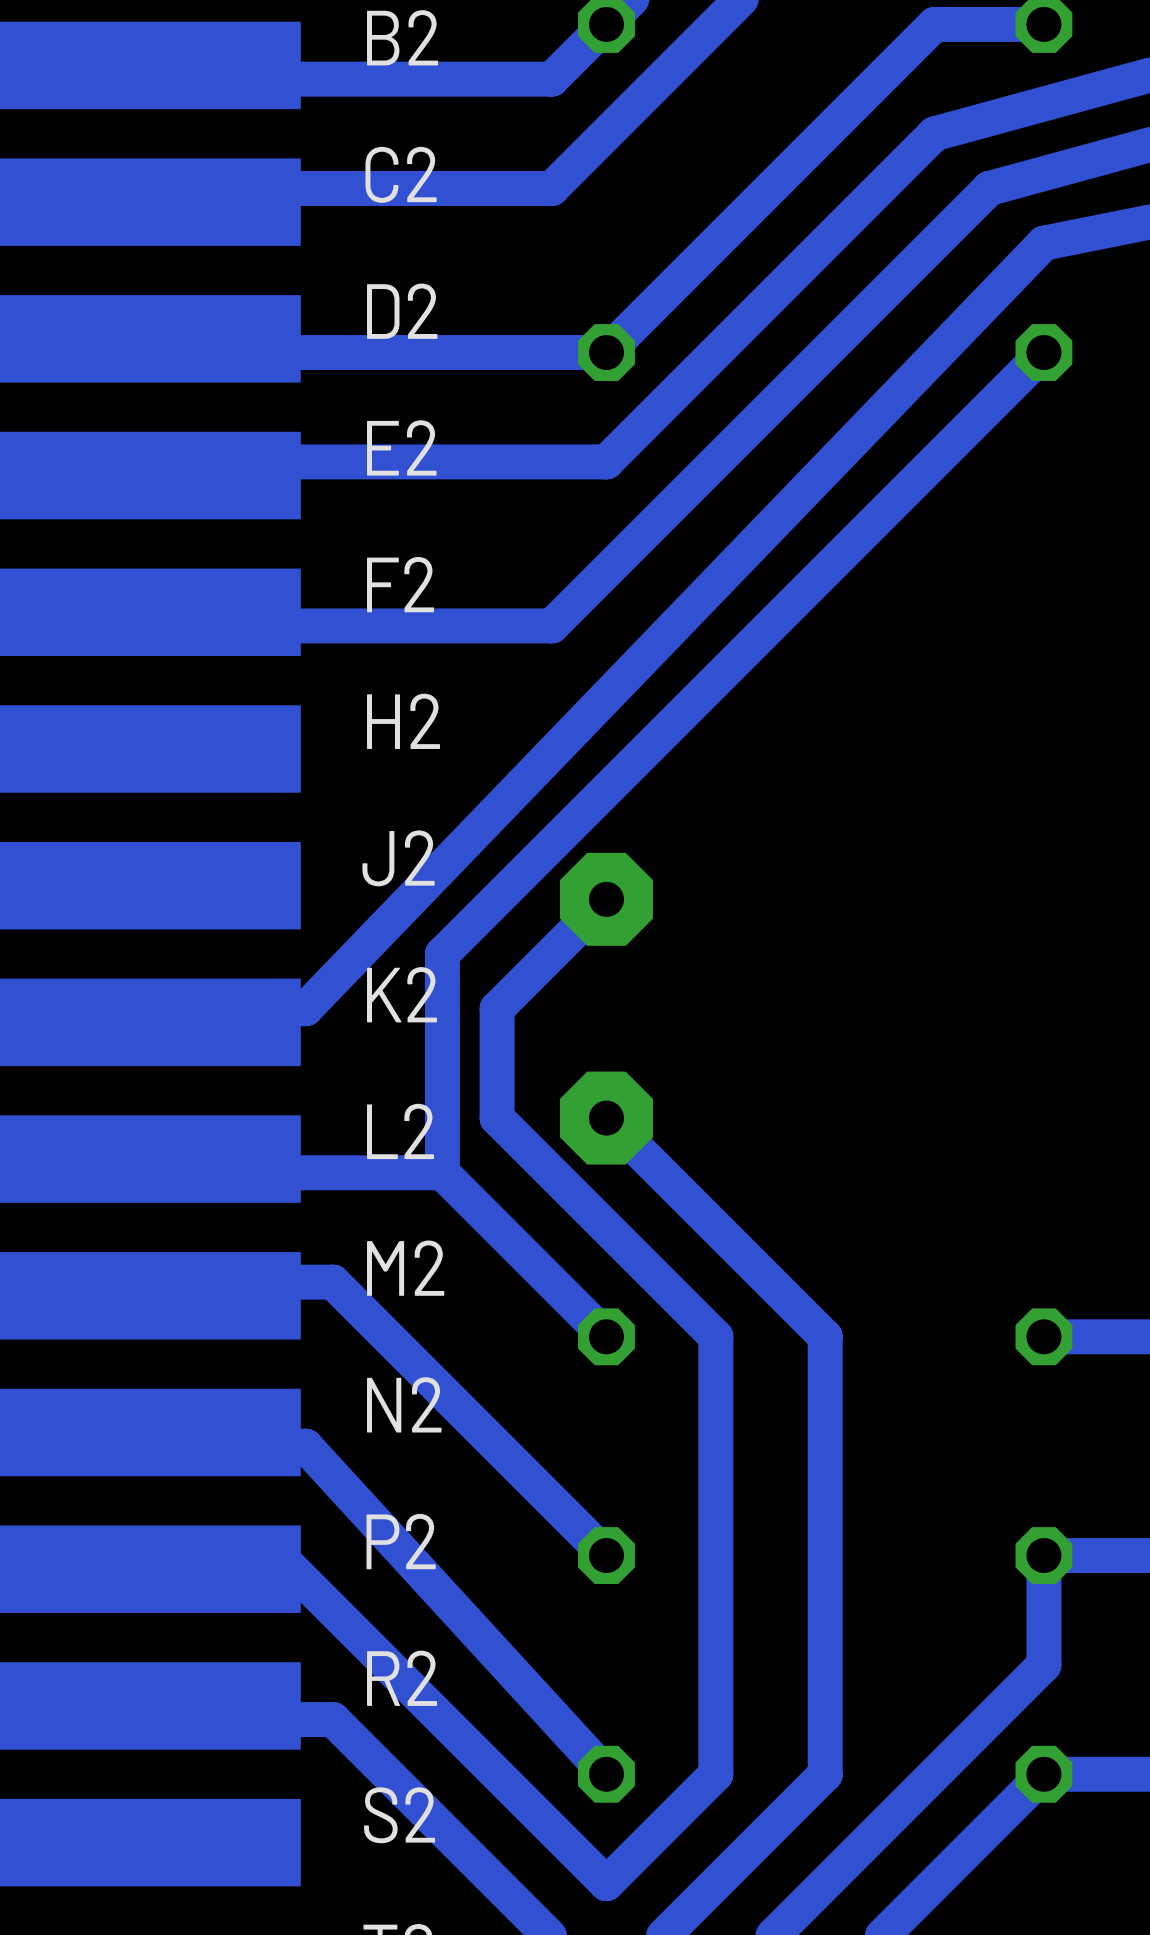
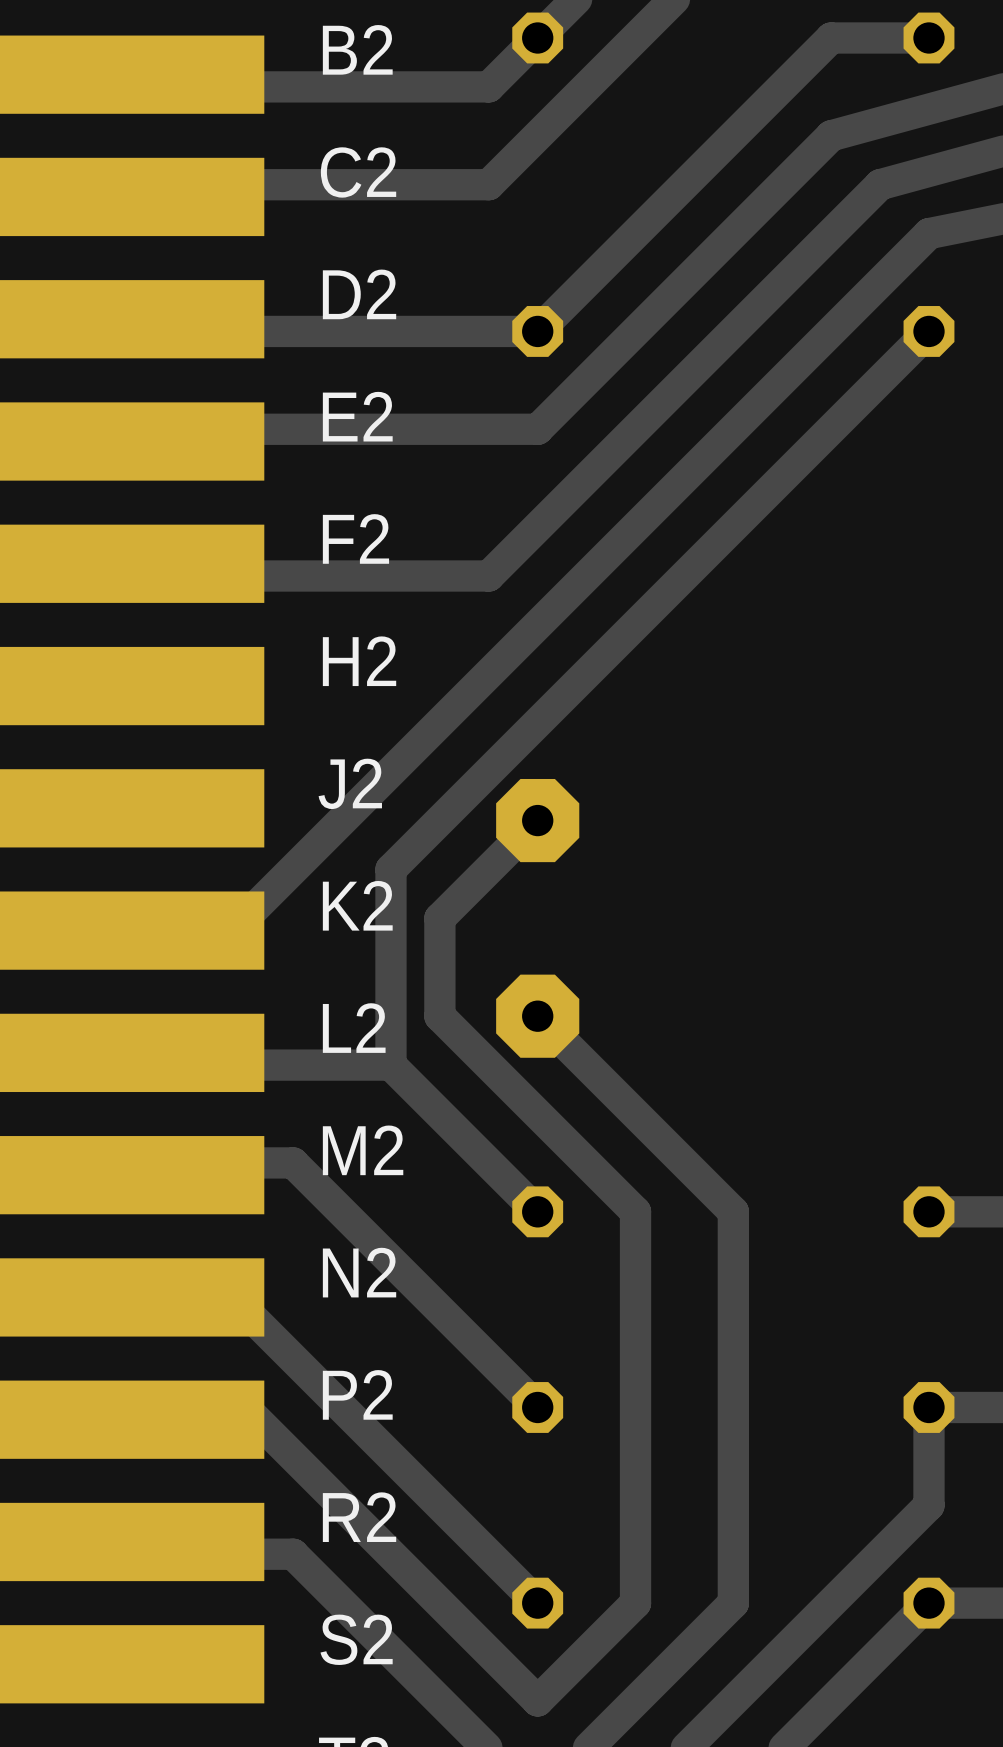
track: (1043, 243) (305, 1008) (278, 1008) -> (928, 233) (244, 918)
track: (278, 1446) (305, 1446) (606, 1774) -> (244, 1309) (537, 1603)

